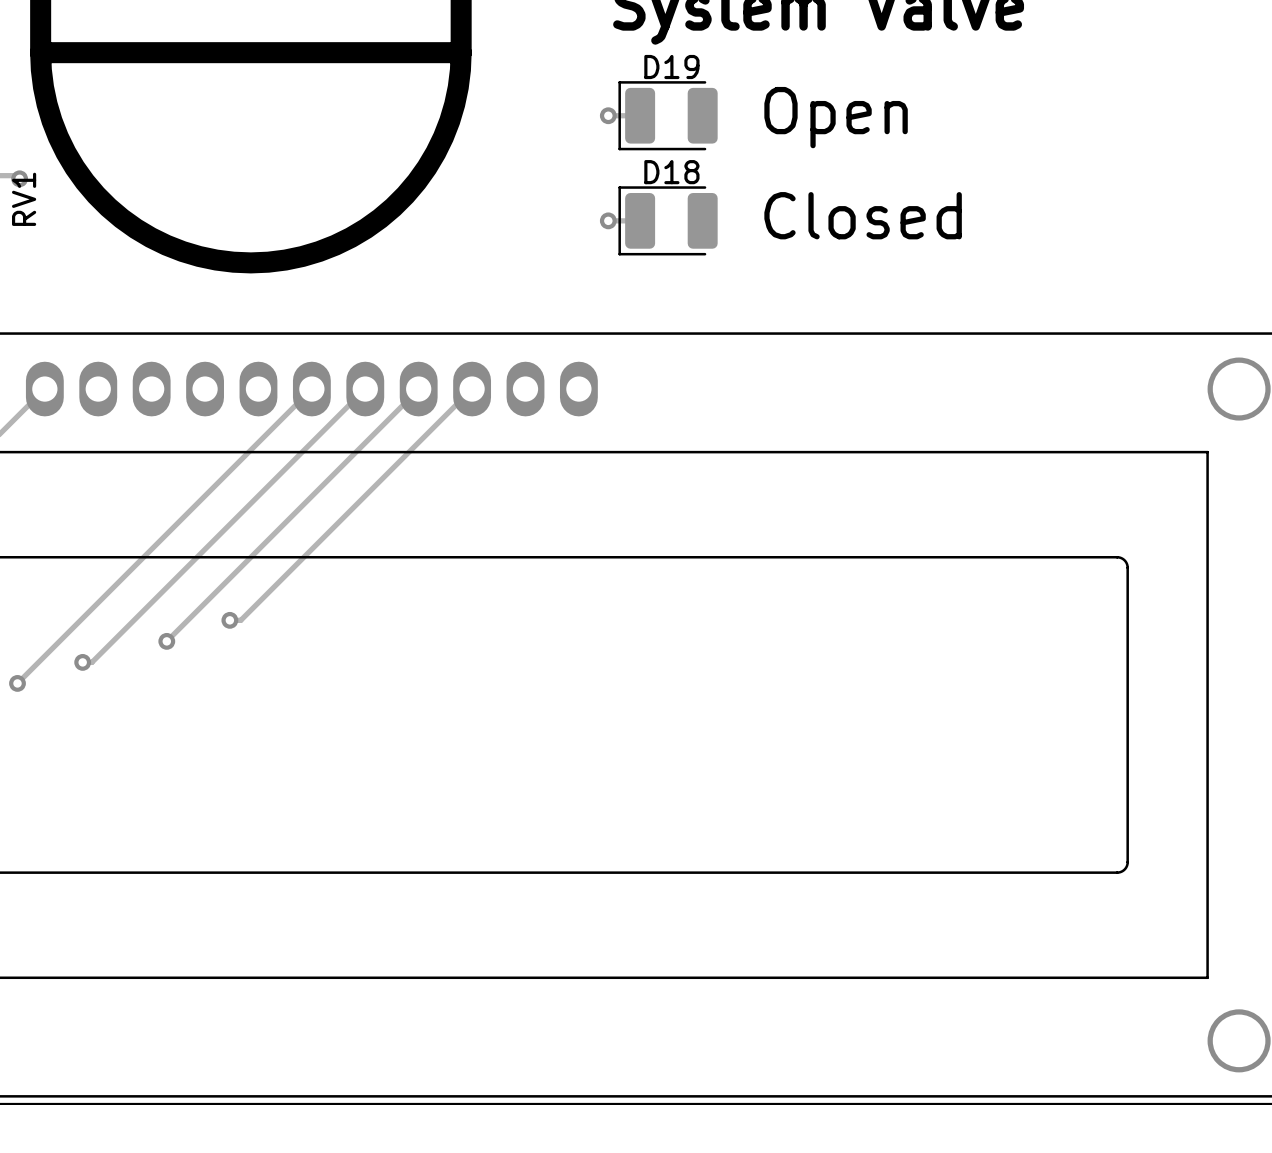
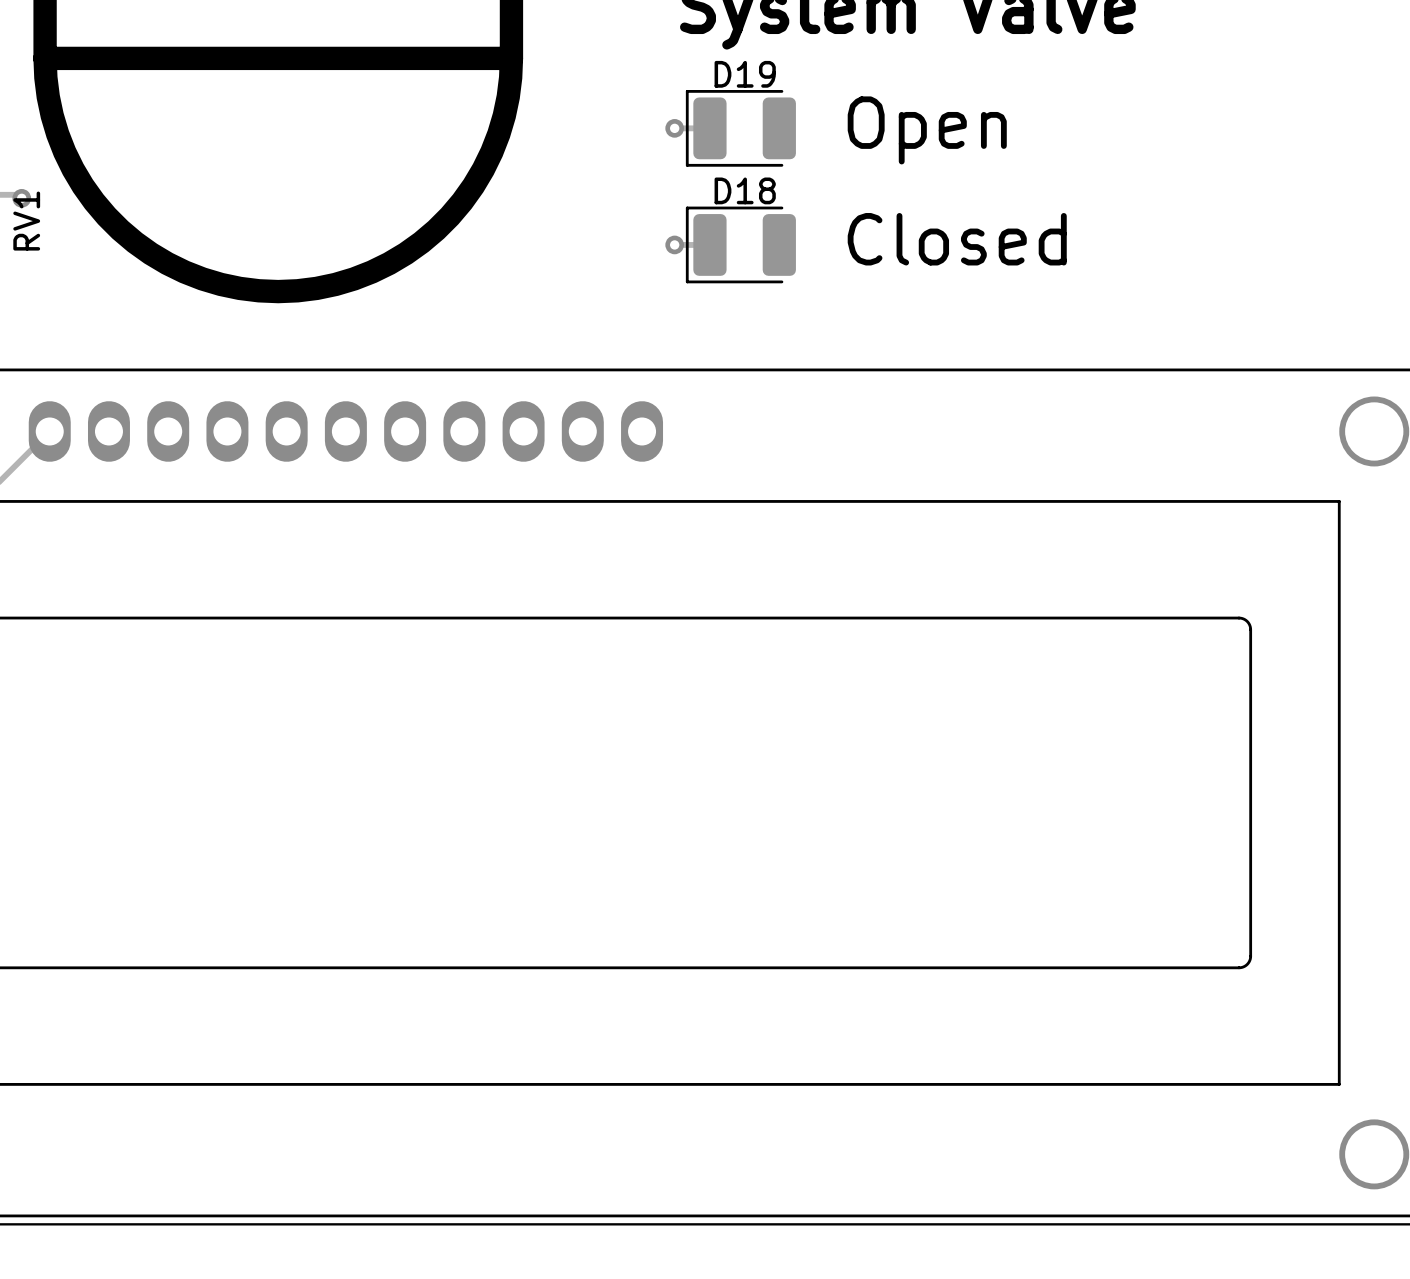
track: (311, 389) (17, 683) -> none
track: (365, 389) (91, 662) (82, 662) -> none
track: (418, 389) (166, 641) -> none
track: (472, 389) (240, 620) (229, 620) -> none
via: (229, 620) -> none
via: (166, 641) -> none
via: (82, 662) -> none
via: (17, 683) -> none

